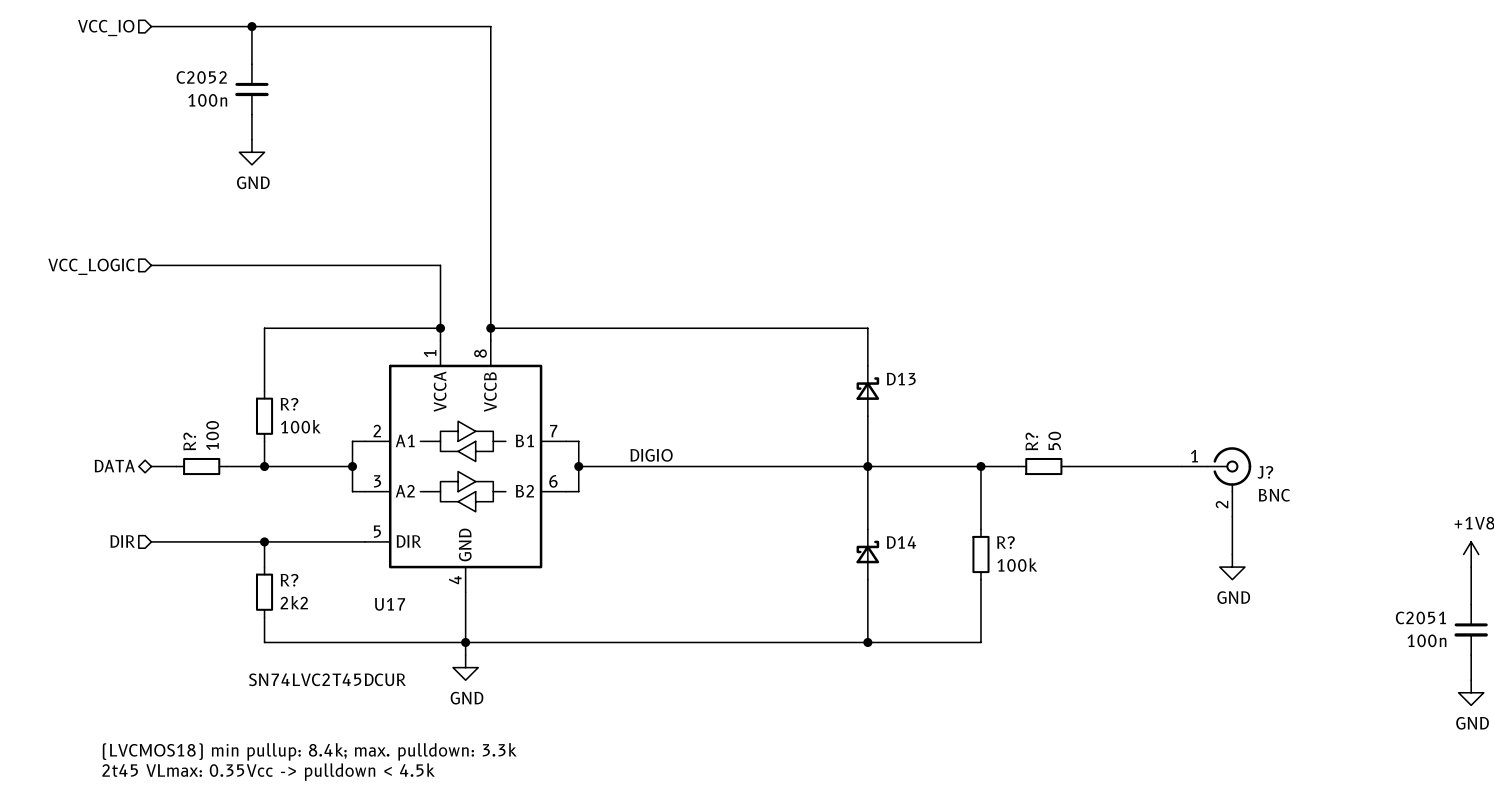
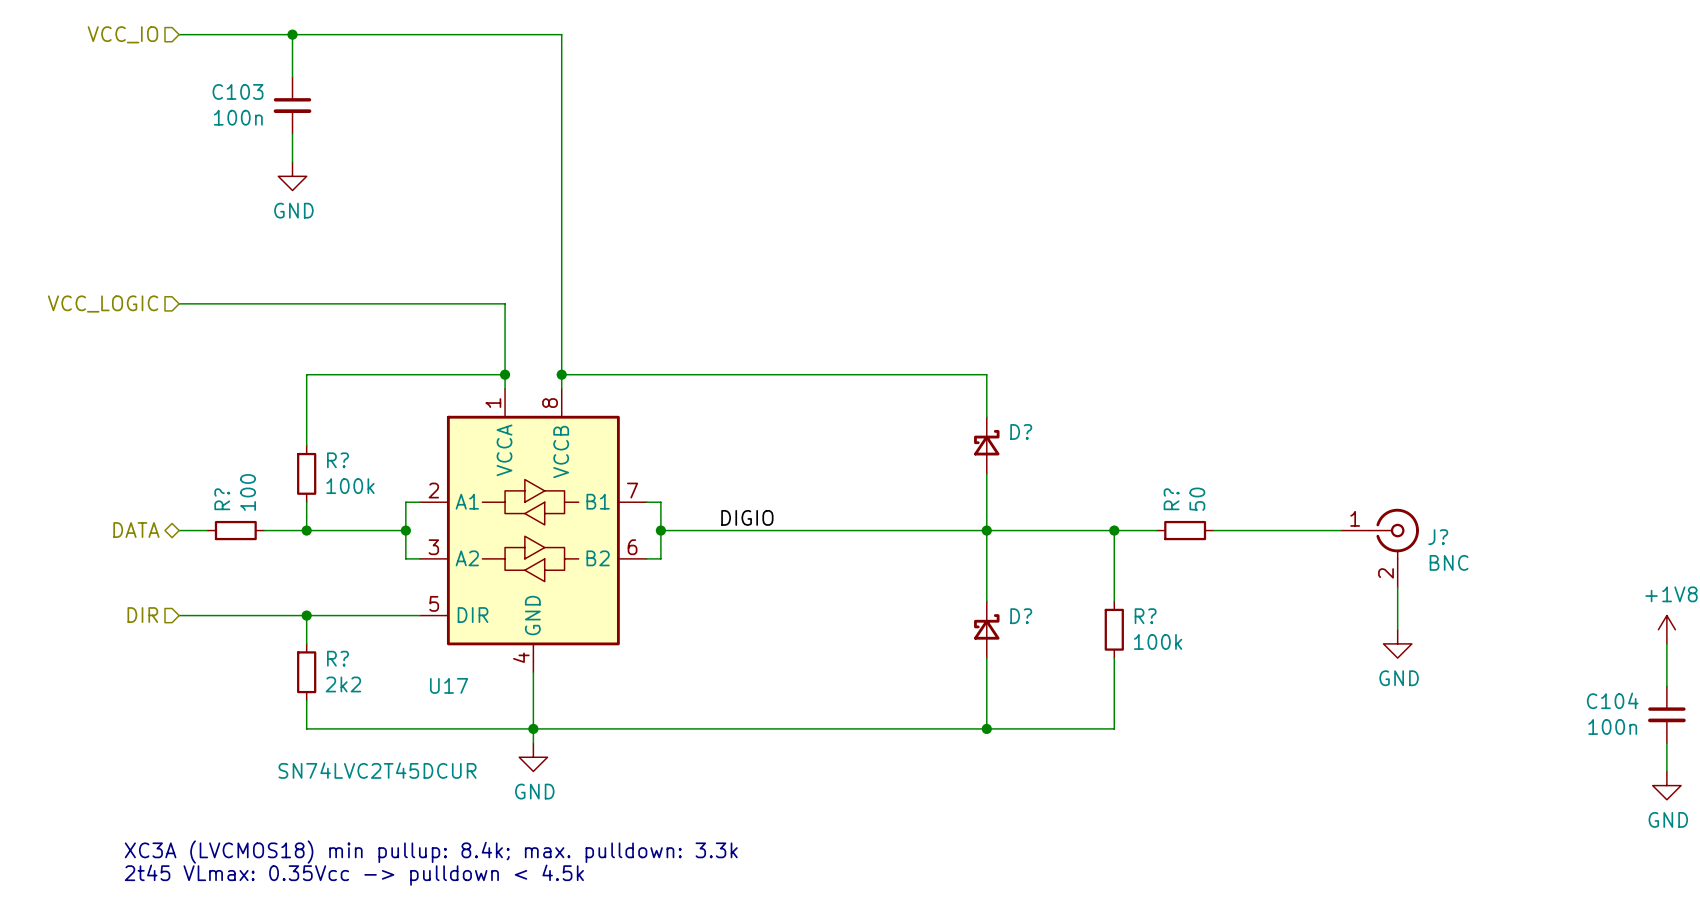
C2052 name: C2052 (201, 77) -> C103 (237, 91)
D13 name: D13 (901, 379) -> D? (1021, 431)
D14 name: D14 (901, 542) -> D? (1021, 616)
C2051 name: C2051 (1420, 617) -> C104 (1612, 700)
text: (LVCMOS18) min pullup: 8.4k; max. pulldown: 3.3k (309, 751) -> XC3A (LVCMOS18) min pullup: 8.4k; max. pulldown: 3.3k (431, 852)

